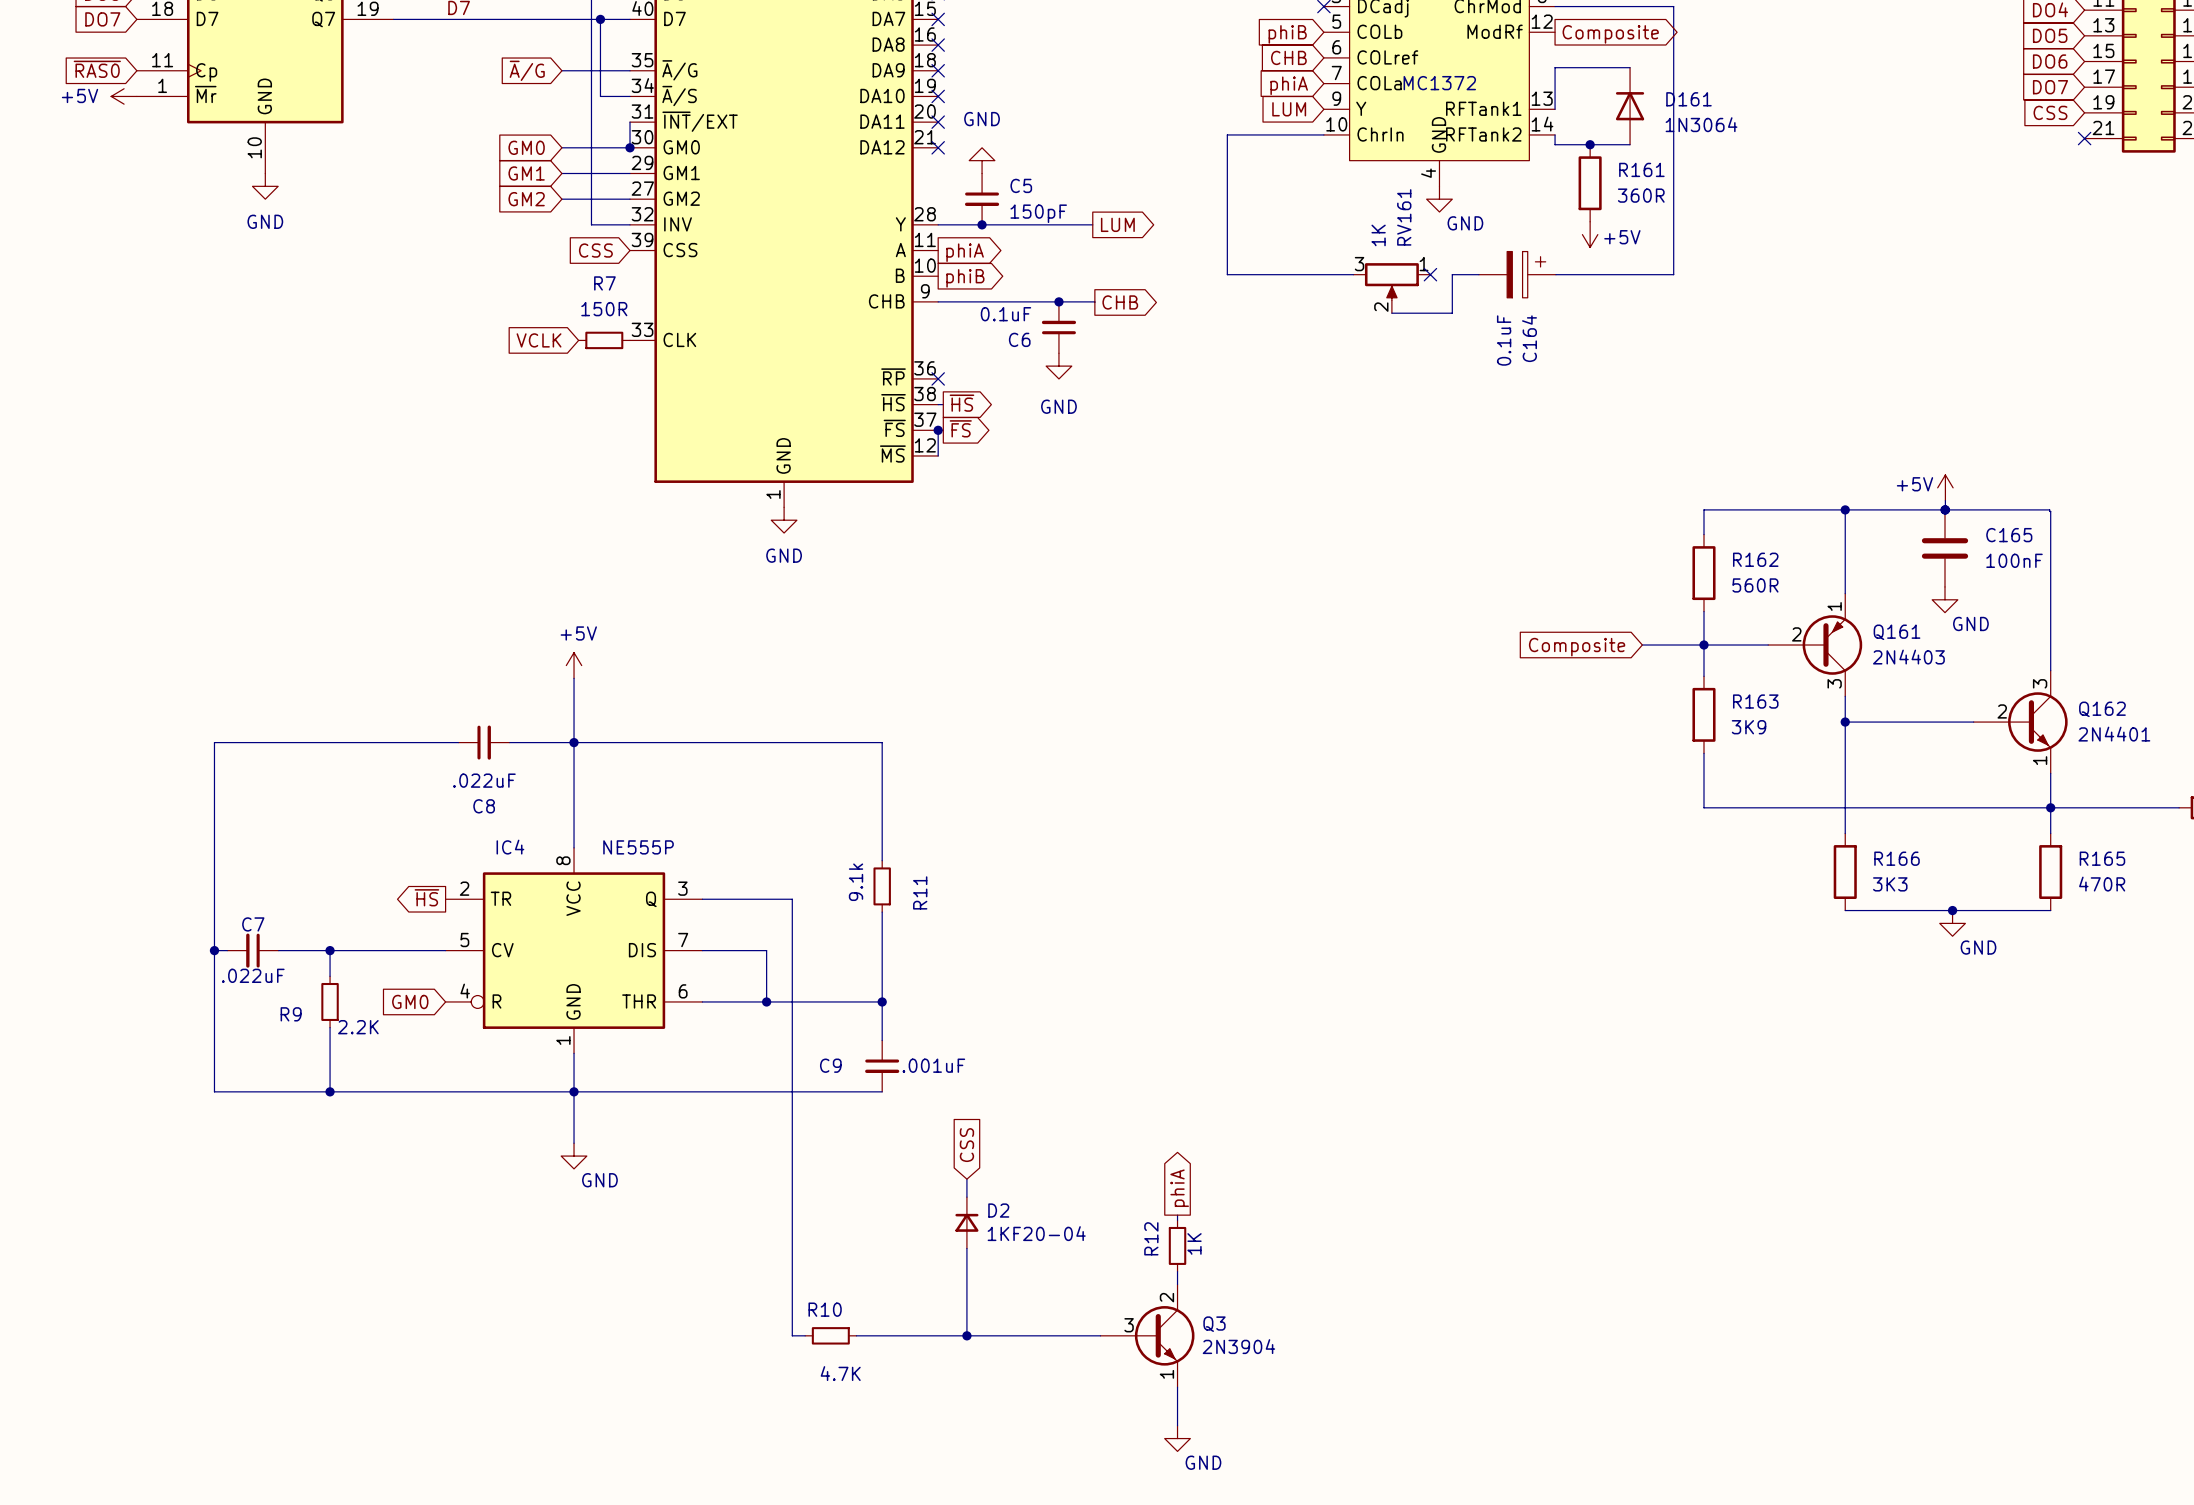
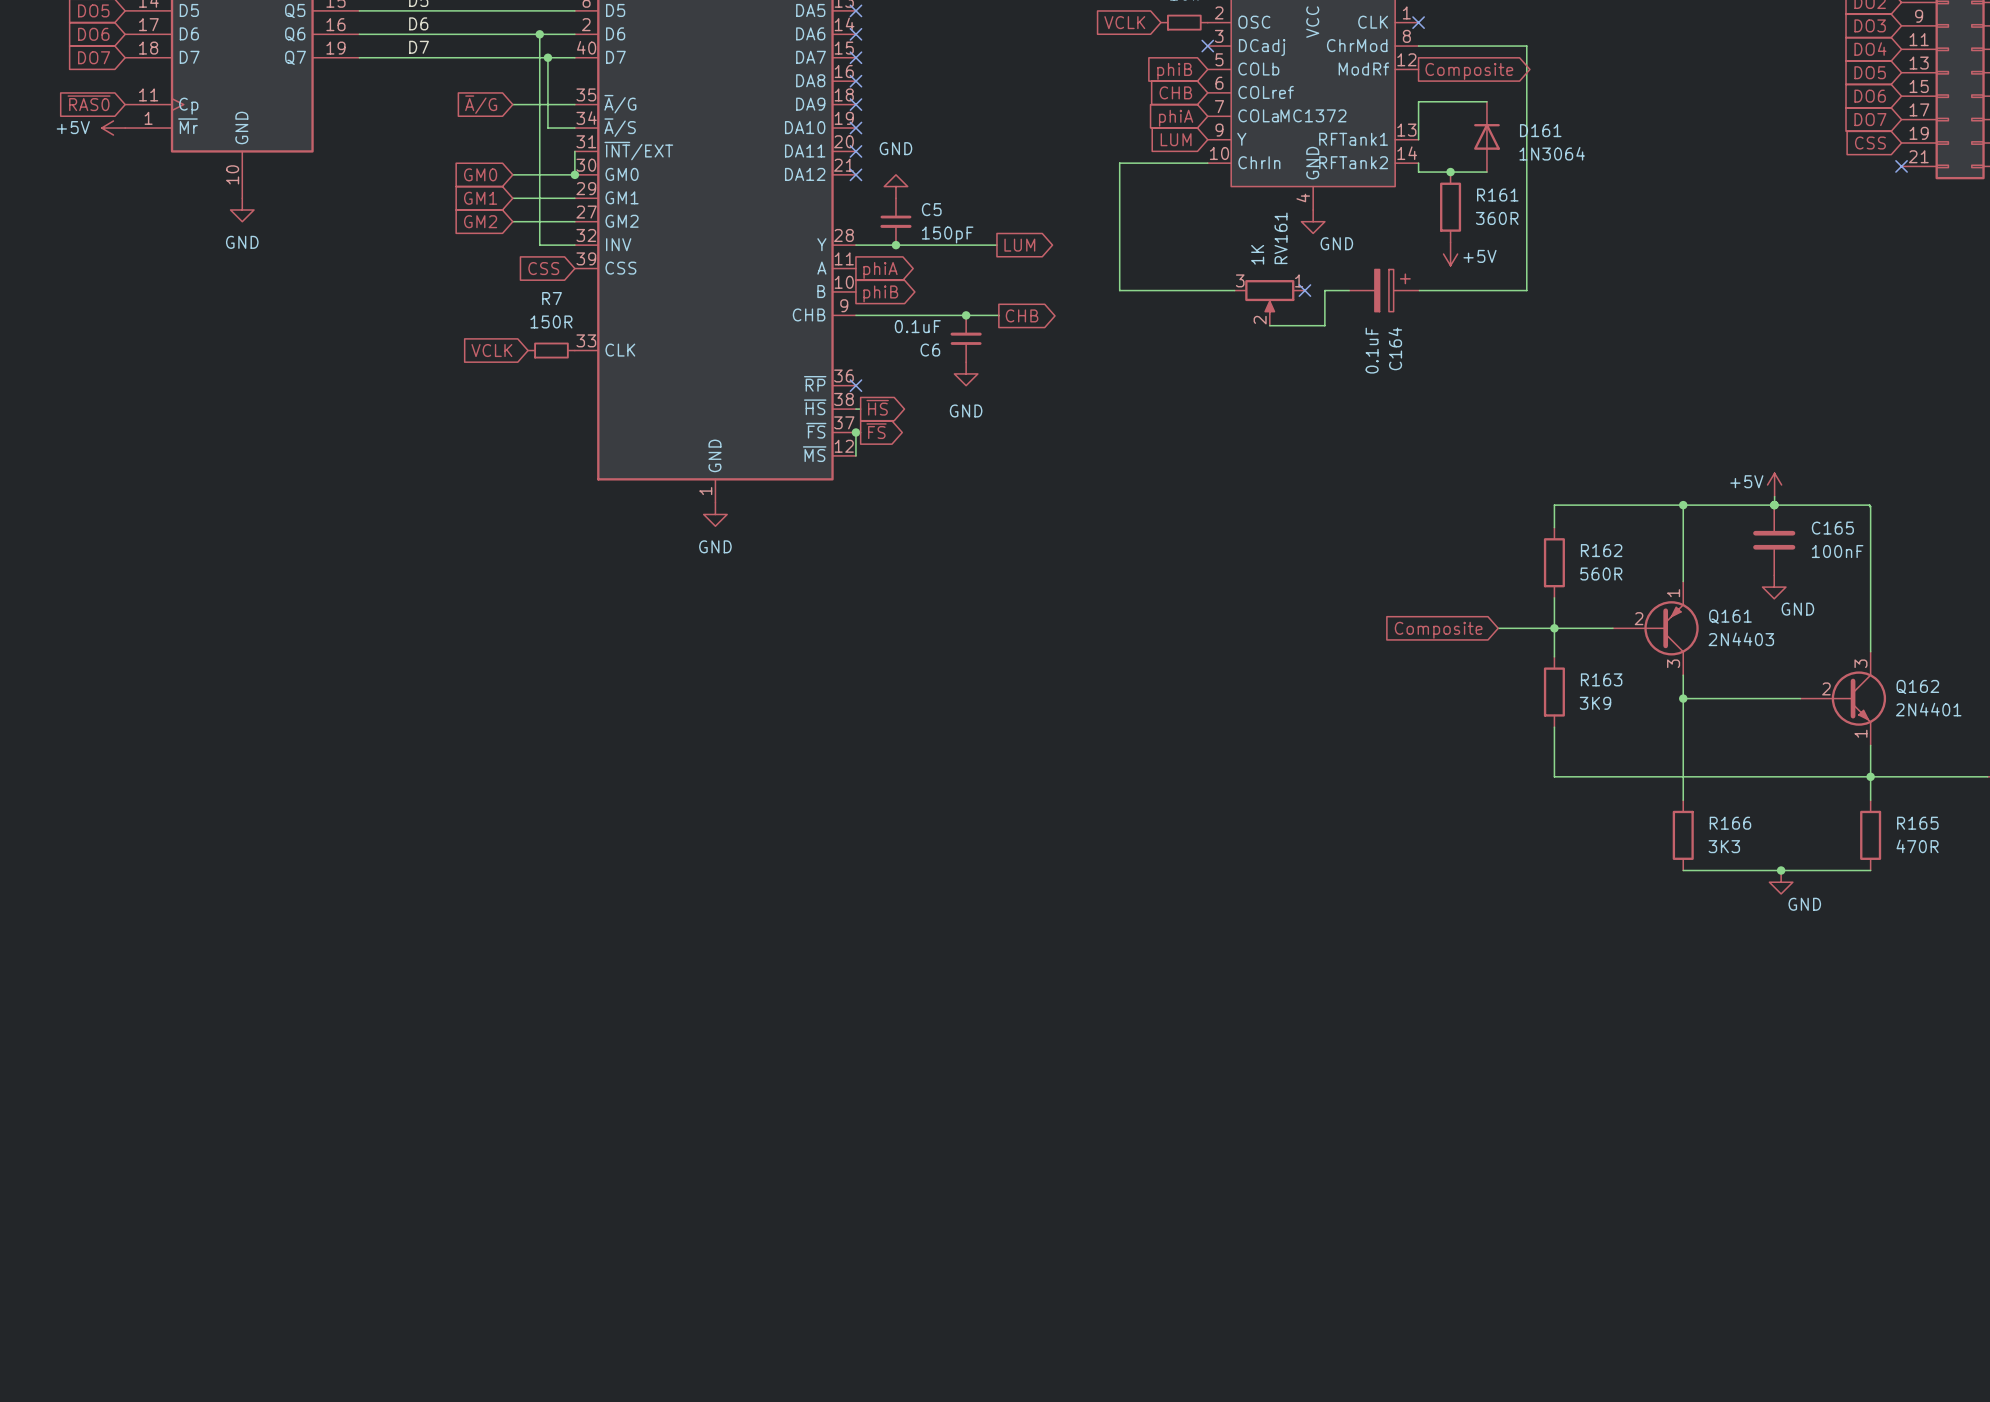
power symbol: +5V (574, 665) -> none
wire: (574, 678) (574, 847) -> none
wire: (458, 742) (214, 742) (214, 1091) (882, 1091) -> none
C8: .022uF (484, 742) -> none
wire: (509, 742) (882, 742) (882, 860) -> none
junction: (574, 742) -> none
R11: 9.1k (882, 886) -> none
global label: ~{HS} (426, 897) -> none
wire: (702, 899) (792, 899) (792, 1335) (805, 1335) -> none
wire: (882, 912) (882, 1040) -> none
wire: (214, 950) (227, 950) -> none
junction: (214, 950) -> none
C7: .022uF (252, 950) -> none
wire: (278, 950) (445, 950) -> none
wire: (330, 950) (330, 976) -> none
junction: (330, 950) -> none
IC4: NE555P (574, 950) -> none
wire: (702, 950) (766, 950) (766, 1001) -> none
R9: 2.2K (330, 1001) -> none
global label: GM0 (410, 1001) -> none
wire: (702, 1001) (882, 1001) -> none
junction: (766, 1001) -> none
junction: (882, 1001) -> none
wire: (330, 1027) (330, 1091) -> none
wire: (574, 1053) (574, 1143) -> none
C9: .001uF (882, 1066) -> none
junction: (330, 1091) -> none
junction: (574, 1091) -> none
global label: CSS (966, 1145) -> none
power symbol: GND (574, 1156) -> none
wire: (966, 1179) (966, 1197) -> none
global label: phiA (1179, 1188) -> none
wire: (1177, 1215) (1177, 1220) -> none
D2: 1KF20-04 (966, 1222) -> none
R12: 1K (1177, 1245) -> none
wire: (966, 1248) (966, 1335) -> none
wire: (1177, 1271) (1177, 1284) -> none
R10: 4.7K (830, 1335) -> none
wire: (856, 1335) (1100, 1335) -> none
junction: (966, 1335) -> none
Q3: 2N3904 (1147, 1335) -> none
wire: (1177, 1387) (1177, 1425) -> none
power symbol: GND (1177, 1438) -> none

